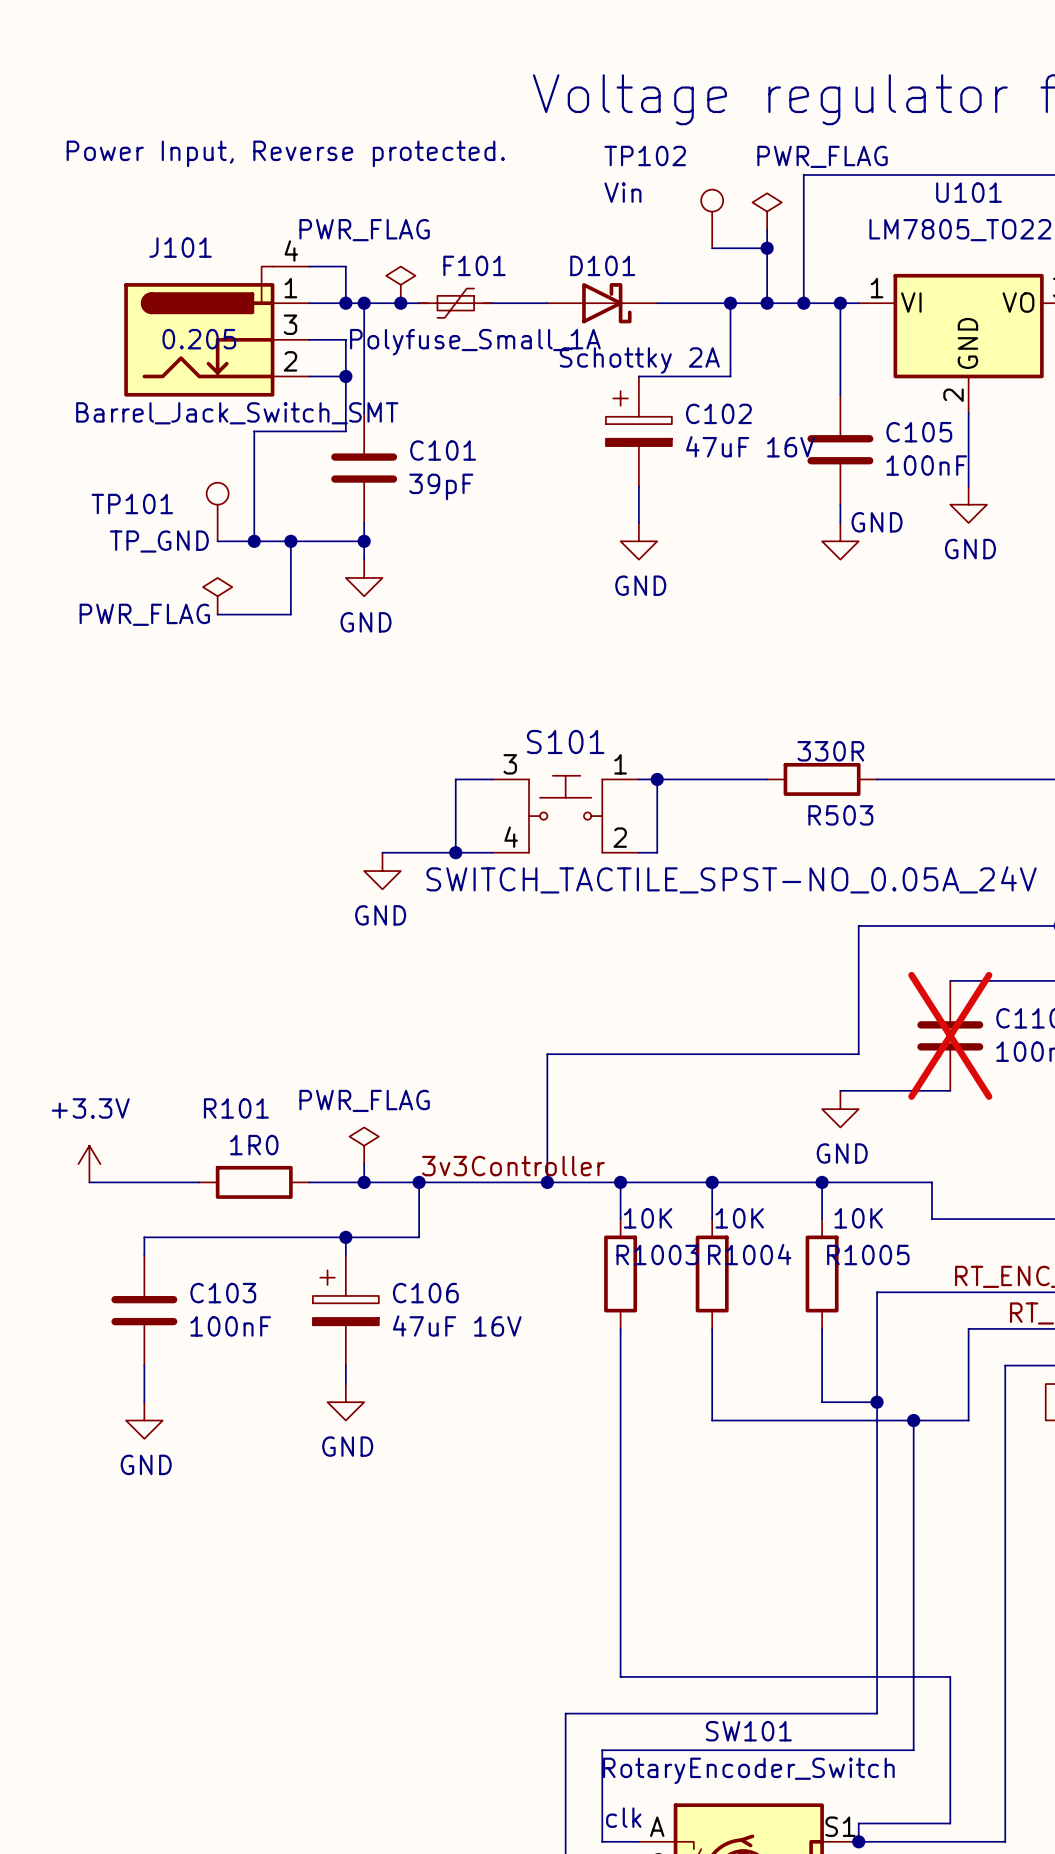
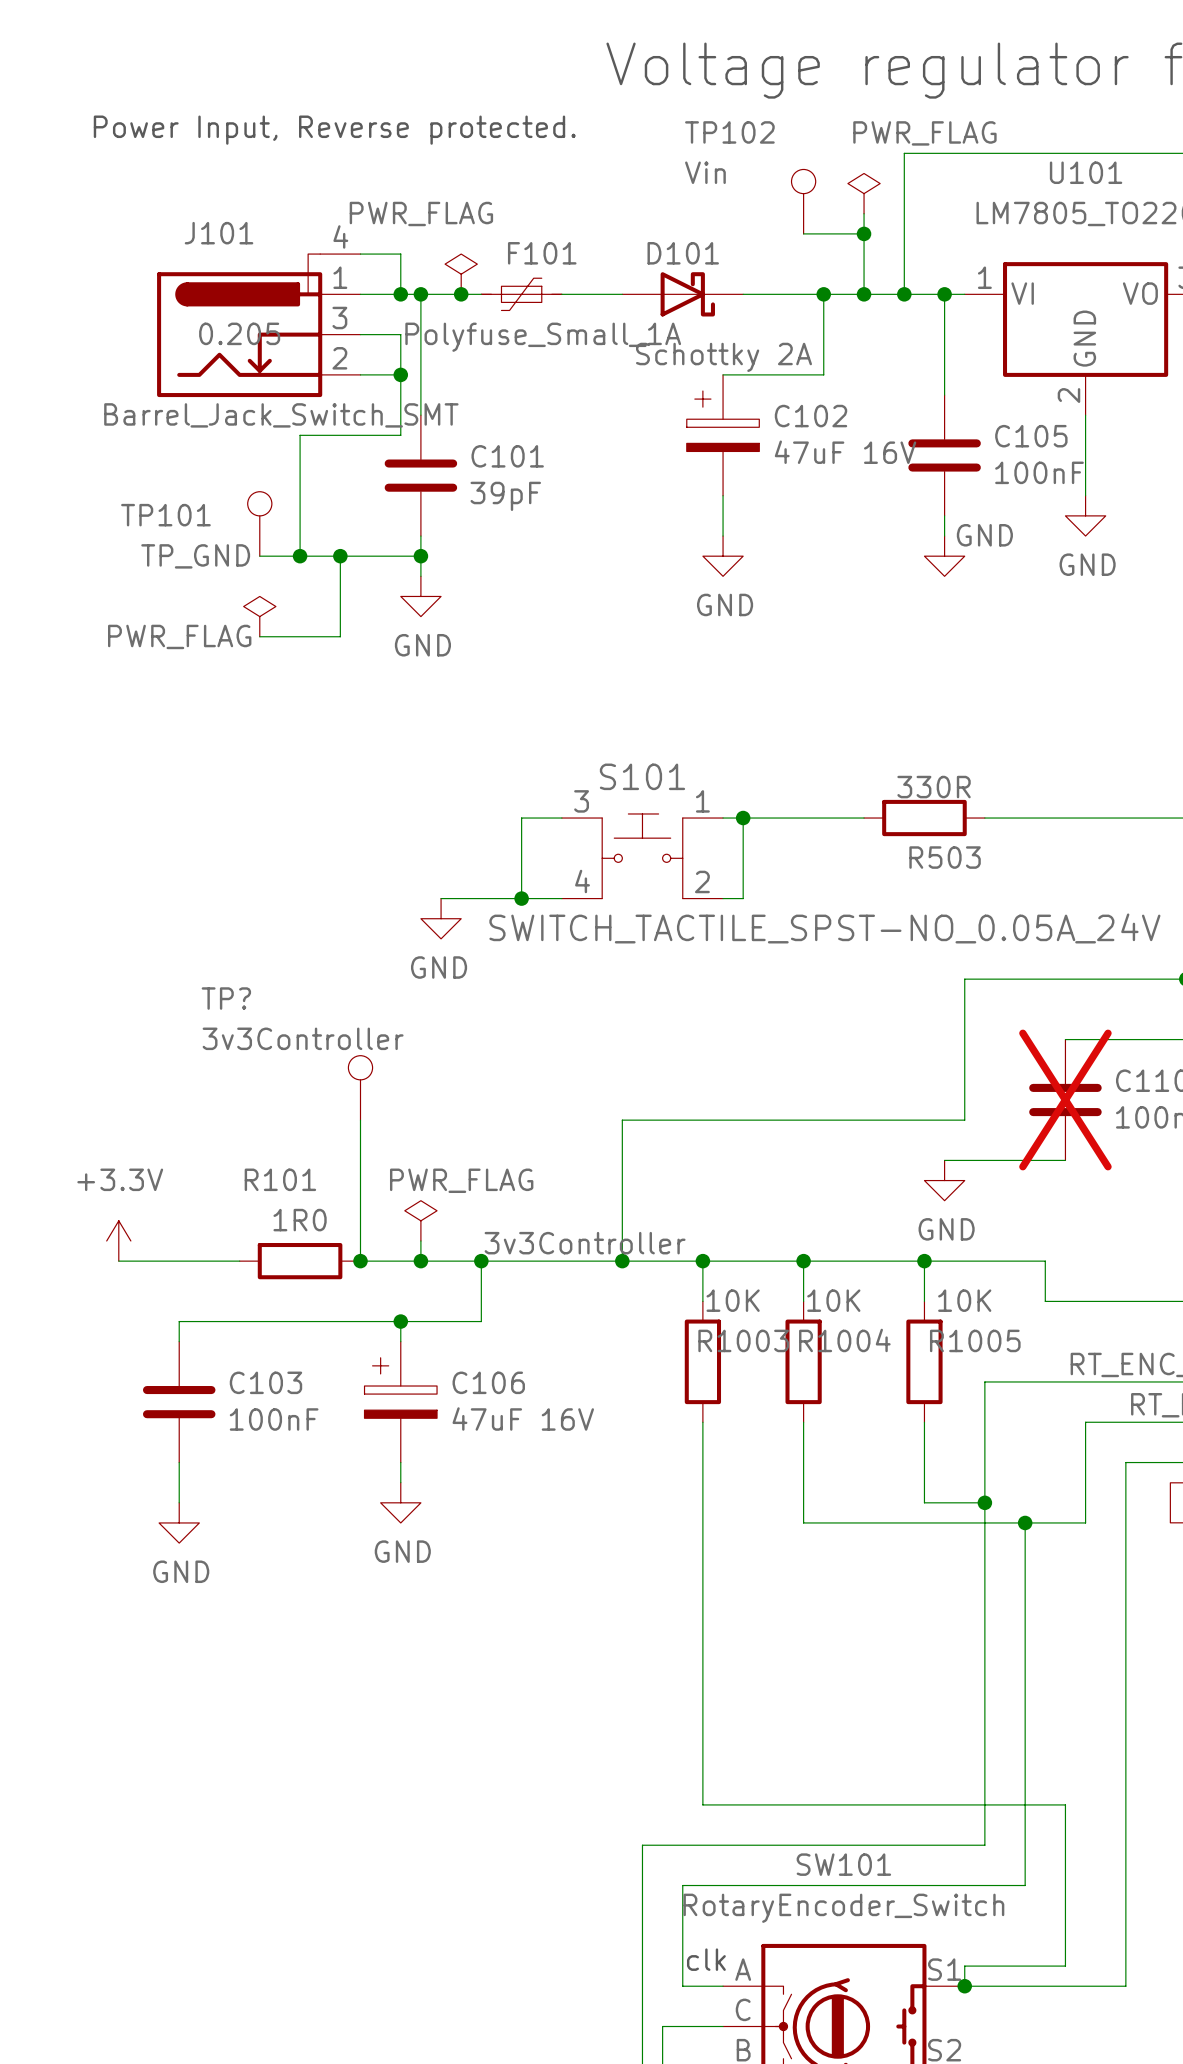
TP?: none -> 3v3Controller (360, 1087)
wire: none -> (360, 1120) (360, 1261)
power symbol text position: PWR_FLAG (364, 1100) -> PWR_FLAG (461, 1180)
junction: none -> (360, 1261)

